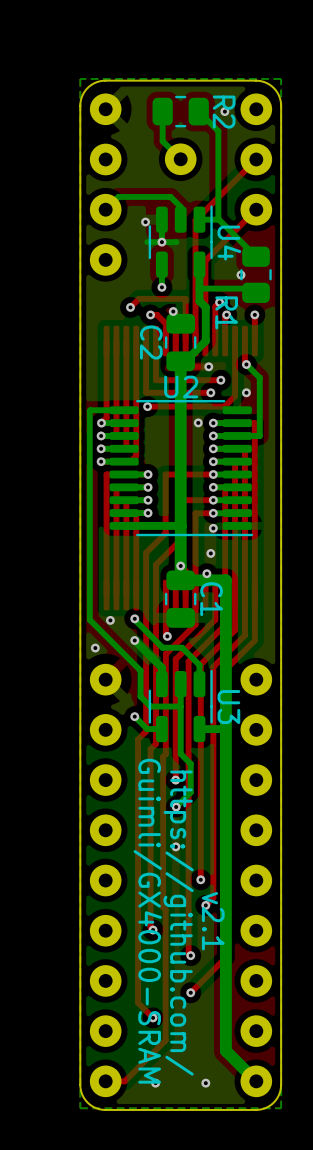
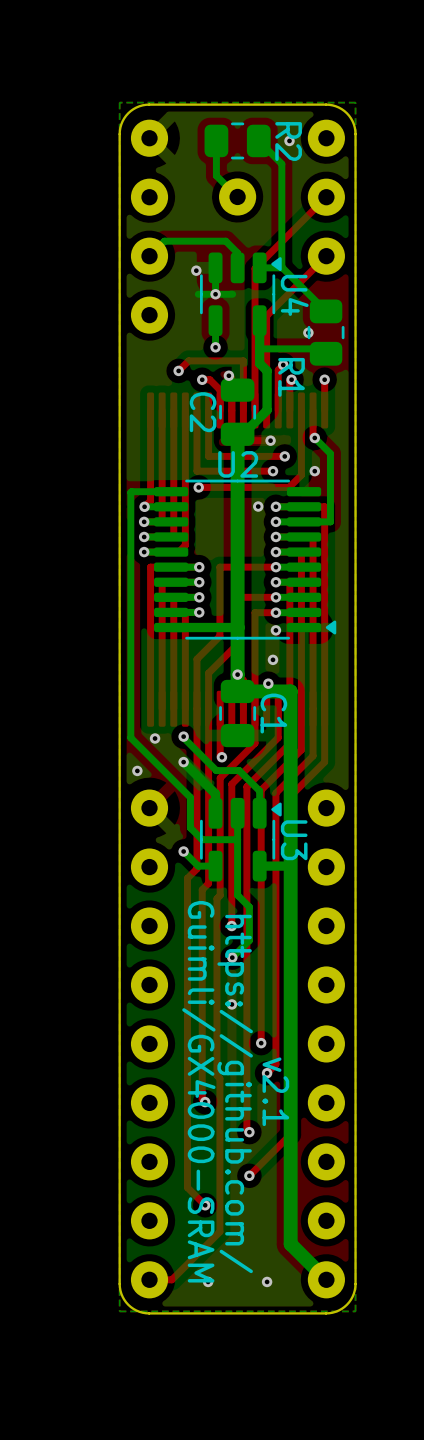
U4 footprint: [148, 205, 213, 278] -> [200, 252, 282, 337]
U2 footprint: [109, 399, 254, 537] -> [154, 479, 337, 640]
U3 footprint: [148, 669, 213, 743] -> [200, 797, 282, 882]

